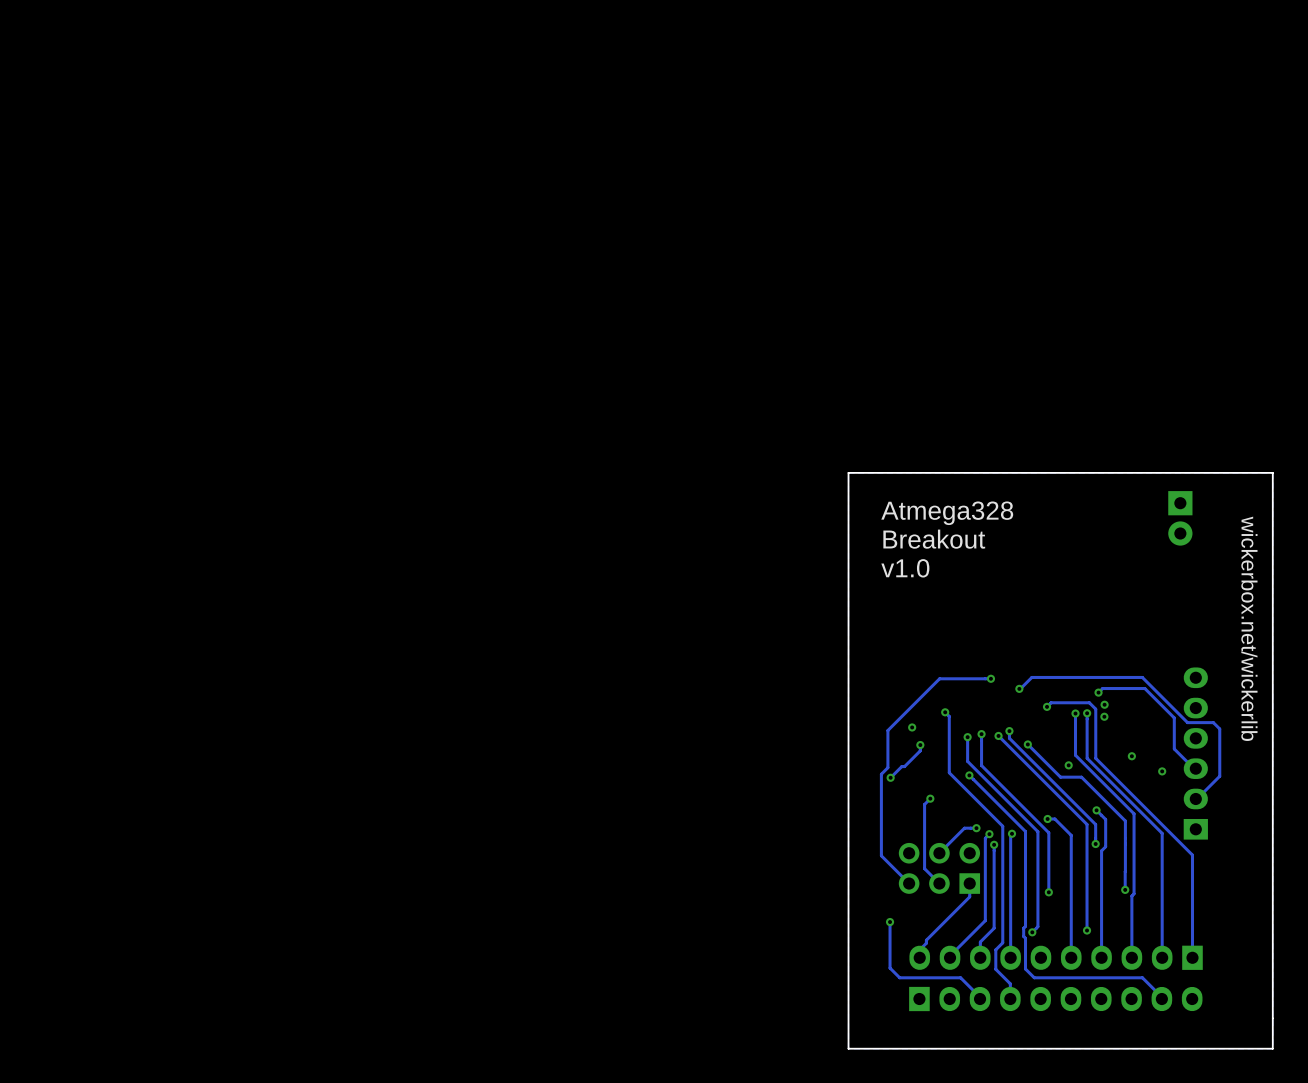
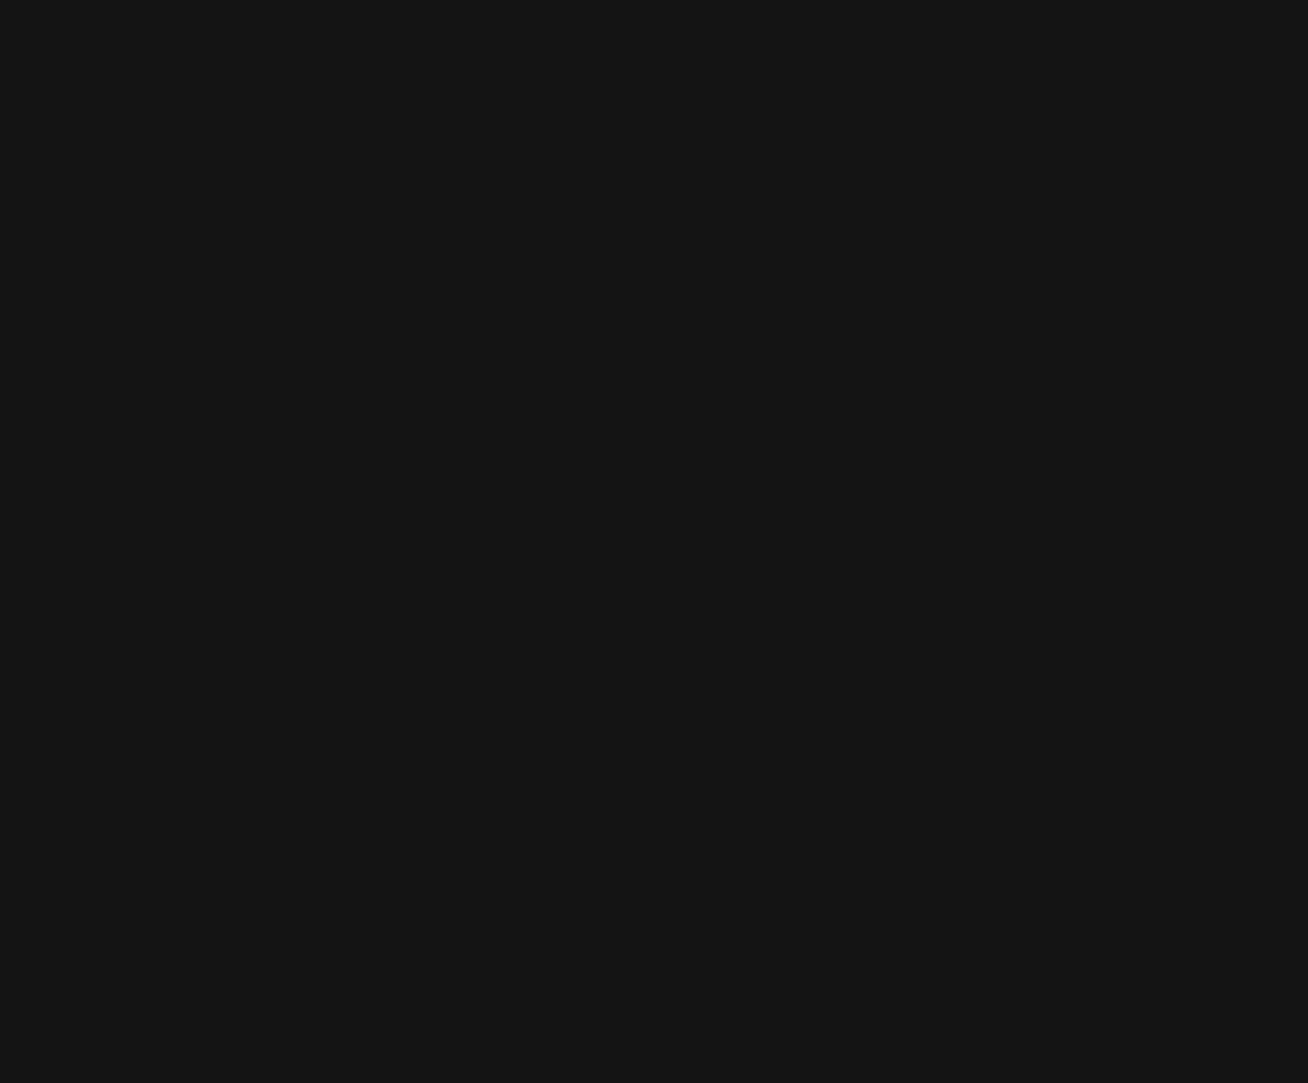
board edge: (1272, 472) (1272, 1048) (848, 1048) (848, 472) (1272, 472) -> none
text: Atmega328 (947, 513) -> none
part: (1180, 518) -> none
text: Breakout (934, 539) -> none
text: v1.0 (905, 568) -> none
text: wickerbox.net/wickerlib (1249, 628) -> none
track: (990, 678) (939, 678) (887, 730) (887, 767) (881, 774) (881, 855) (909, 883) -> none
via: (990, 678) -> none
track: (1019, 688) (1031, 677) (1142, 677) (1187, 722) (1213, 722) (1219, 728) (1219, 776) (1195, 798) -> none
via: (1019, 688) -> none
track: (1098, 692) (1102, 688) (1144, 688) (1174, 717) (1174, 748) (1193, 768) (1197, 768) -> none
via: (1098, 692) -> none
via: (1104, 704) -> none
track: (1047, 706) (1051, 702) (1089, 702) (1095, 709) (1095, 758) (1192, 855) (1192, 957) -> none
via: (1047, 706) -> none
track: (945, 712) (949, 716) (949, 772) (1002, 826) (1002, 942) (995, 949) (995, 969) (1010, 983) (1010, 999) -> none
via: (945, 712) -> none
track: (1075, 713) (1075, 755) (1134, 813) (1131, 957) -> none
via: (1075, 713) -> none
track: (1087, 713) (1087, 758) (1162, 833) (1162, 957) -> none
via: (1087, 713) -> none
via: (1104, 716) -> none
via: (912, 727) -> none
track: (1009, 731) (1009, 738) (1095, 824) (1095, 843) -> none
via: (1009, 731) -> none
track: (981, 734) (981, 765) (1048, 832) (1048, 892) -> none
via: (981, 734) -> none
track: (998, 735) (1087, 824) (1087, 930) -> none
via: (998, 735) -> none
track: (967, 737) (967, 761) (1037, 831) (1037, 926) (1032, 932) -> none
via: (967, 737) -> none
track: (1027, 744) (1060, 777) (1081, 777) (1125, 821) (1125, 889) -> none
via: (1027, 744) -> none
track: (920, 745) (920, 750) (890, 777) -> none
via: (920, 745) -> none
part: (1195, 753) -> none
via: (1131, 756) -> none
via: (1068, 765) -> none
via: (1162, 771) -> none
track: (969, 775) (1025, 831) (1025, 926) (1023, 928) (1025, 969) (1034, 977) (1142, 977) (1161, 999) -> none
via: (969, 775) -> none
via: (890, 777) -> none
track: (930, 798) (924, 804) (924, 868) (939, 883) -> none
via: (930, 798) -> none
track: (1096, 810) (1105, 819) (1105, 846) (1101, 850) (1101, 957) -> none
via: (1096, 810) -> none
track: (1047, 818) (1054, 818) (1071, 835) (1071, 957) -> none
via: (1047, 818) -> none
track: (976, 828) (964, 828) (939, 853) -> none
via: (976, 828) -> none
track: (1012, 833) (1010, 957) -> none
via: (1012, 833) -> none
track: (989, 834) (985, 838) (985, 920) (950, 957) -> none
via: (989, 834) -> none
via: (1095, 843) -> none
track: (994, 844) (994, 928) (980, 942) (980, 957) -> none
via: (994, 844) -> none
part: (939, 868) -> none
track: (969, 883) (969, 896) (926, 940) (926, 943) (919, 949) (919, 957) -> none
via: (1125, 889) -> none
via: (1048, 892) -> none
track: (890, 922) (890, 968) (899, 977) (960, 977) (980, 999) -> none
via: (890, 922) -> none
via: (1087, 930) -> none
via: (1032, 932) -> none
part: (1056, 957) -> none
part: (1055, 999) -> none

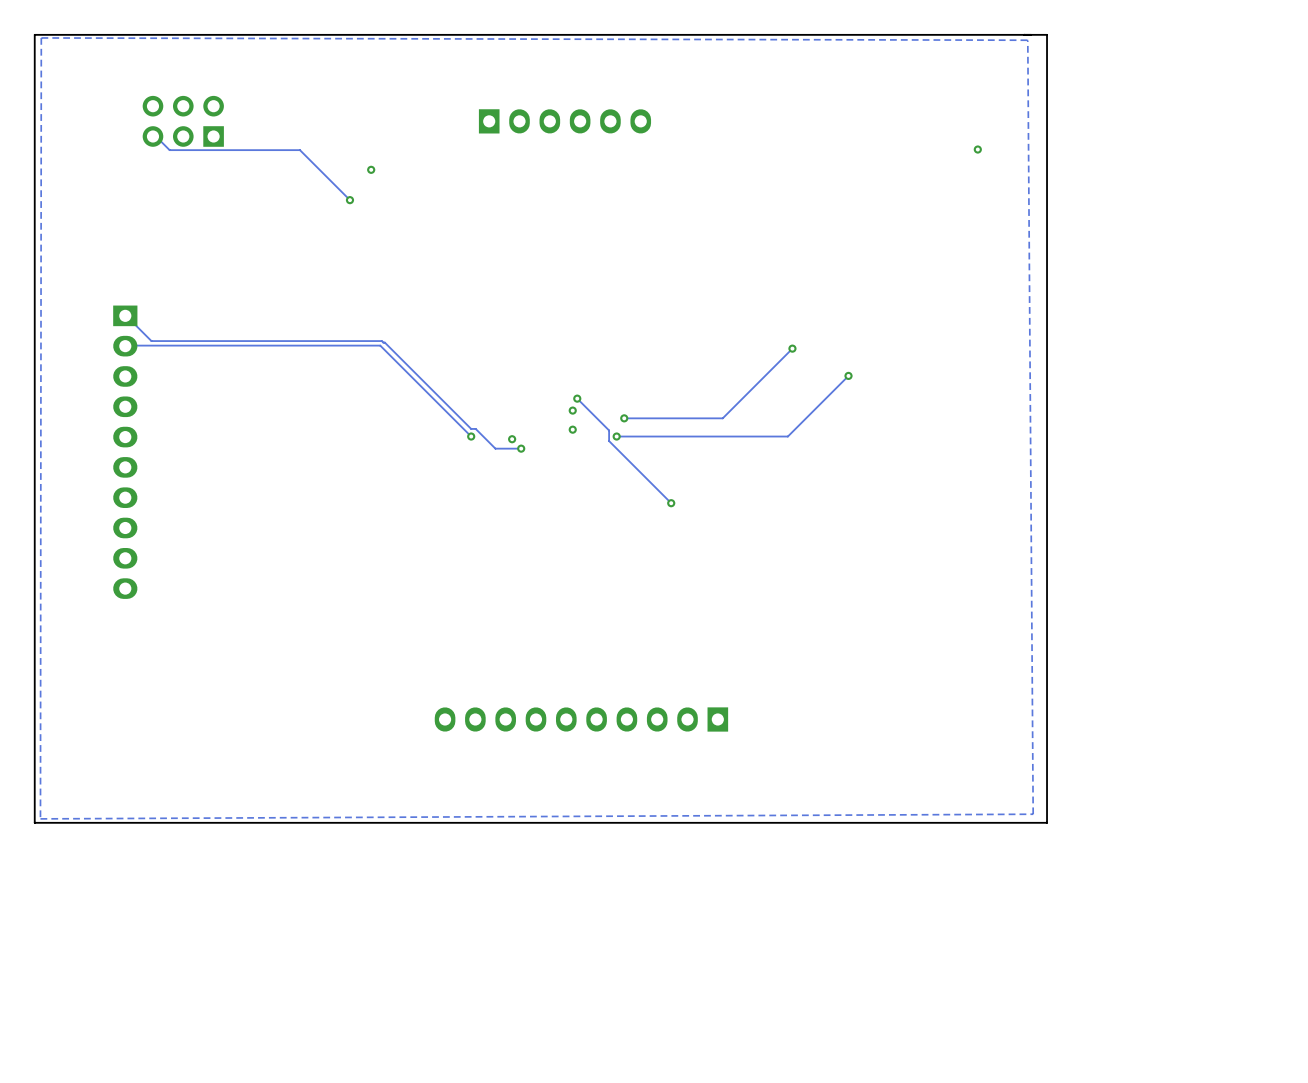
board edge: none -> (1047, 34) (34, 34) (34, 822) (1047, 822) (1047, 34)
zone outline: none -> (41, 37) (1027, 40) (1033, 814) (40, 818) (41, 37)
part: none -> (183, 121)
part: none -> (564, 121)
track: none -> (152, 136) (156, 136) (169, 150) (299, 150) (349, 200)
via: none -> (977, 149)
via: none -> (371, 169)
via: none -> (349, 200)
track: none -> (125, 315) (151, 341) (381, 341) (471, 428) (475, 428) (495, 448) (521, 448)
track: none -> (125, 346) (380, 345) (471, 436)
track: none -> (792, 348) (722, 418) (624, 418)
via: none -> (792, 348)
track: none -> (848, 375) (787, 436) (616, 436)
via: none -> (848, 375)
track: none -> (577, 398) (609, 430) (609, 441) (671, 503)
via: none -> (577, 398)
via: none -> (572, 410)
via: none -> (624, 418)
via: none -> (572, 429)
via: none -> (471, 436)
via: none -> (616, 436)
via: none -> (512, 439)
via: none -> (521, 448)
part: none -> (125, 452)
via: none -> (671, 503)
part: none -> (581, 719)

